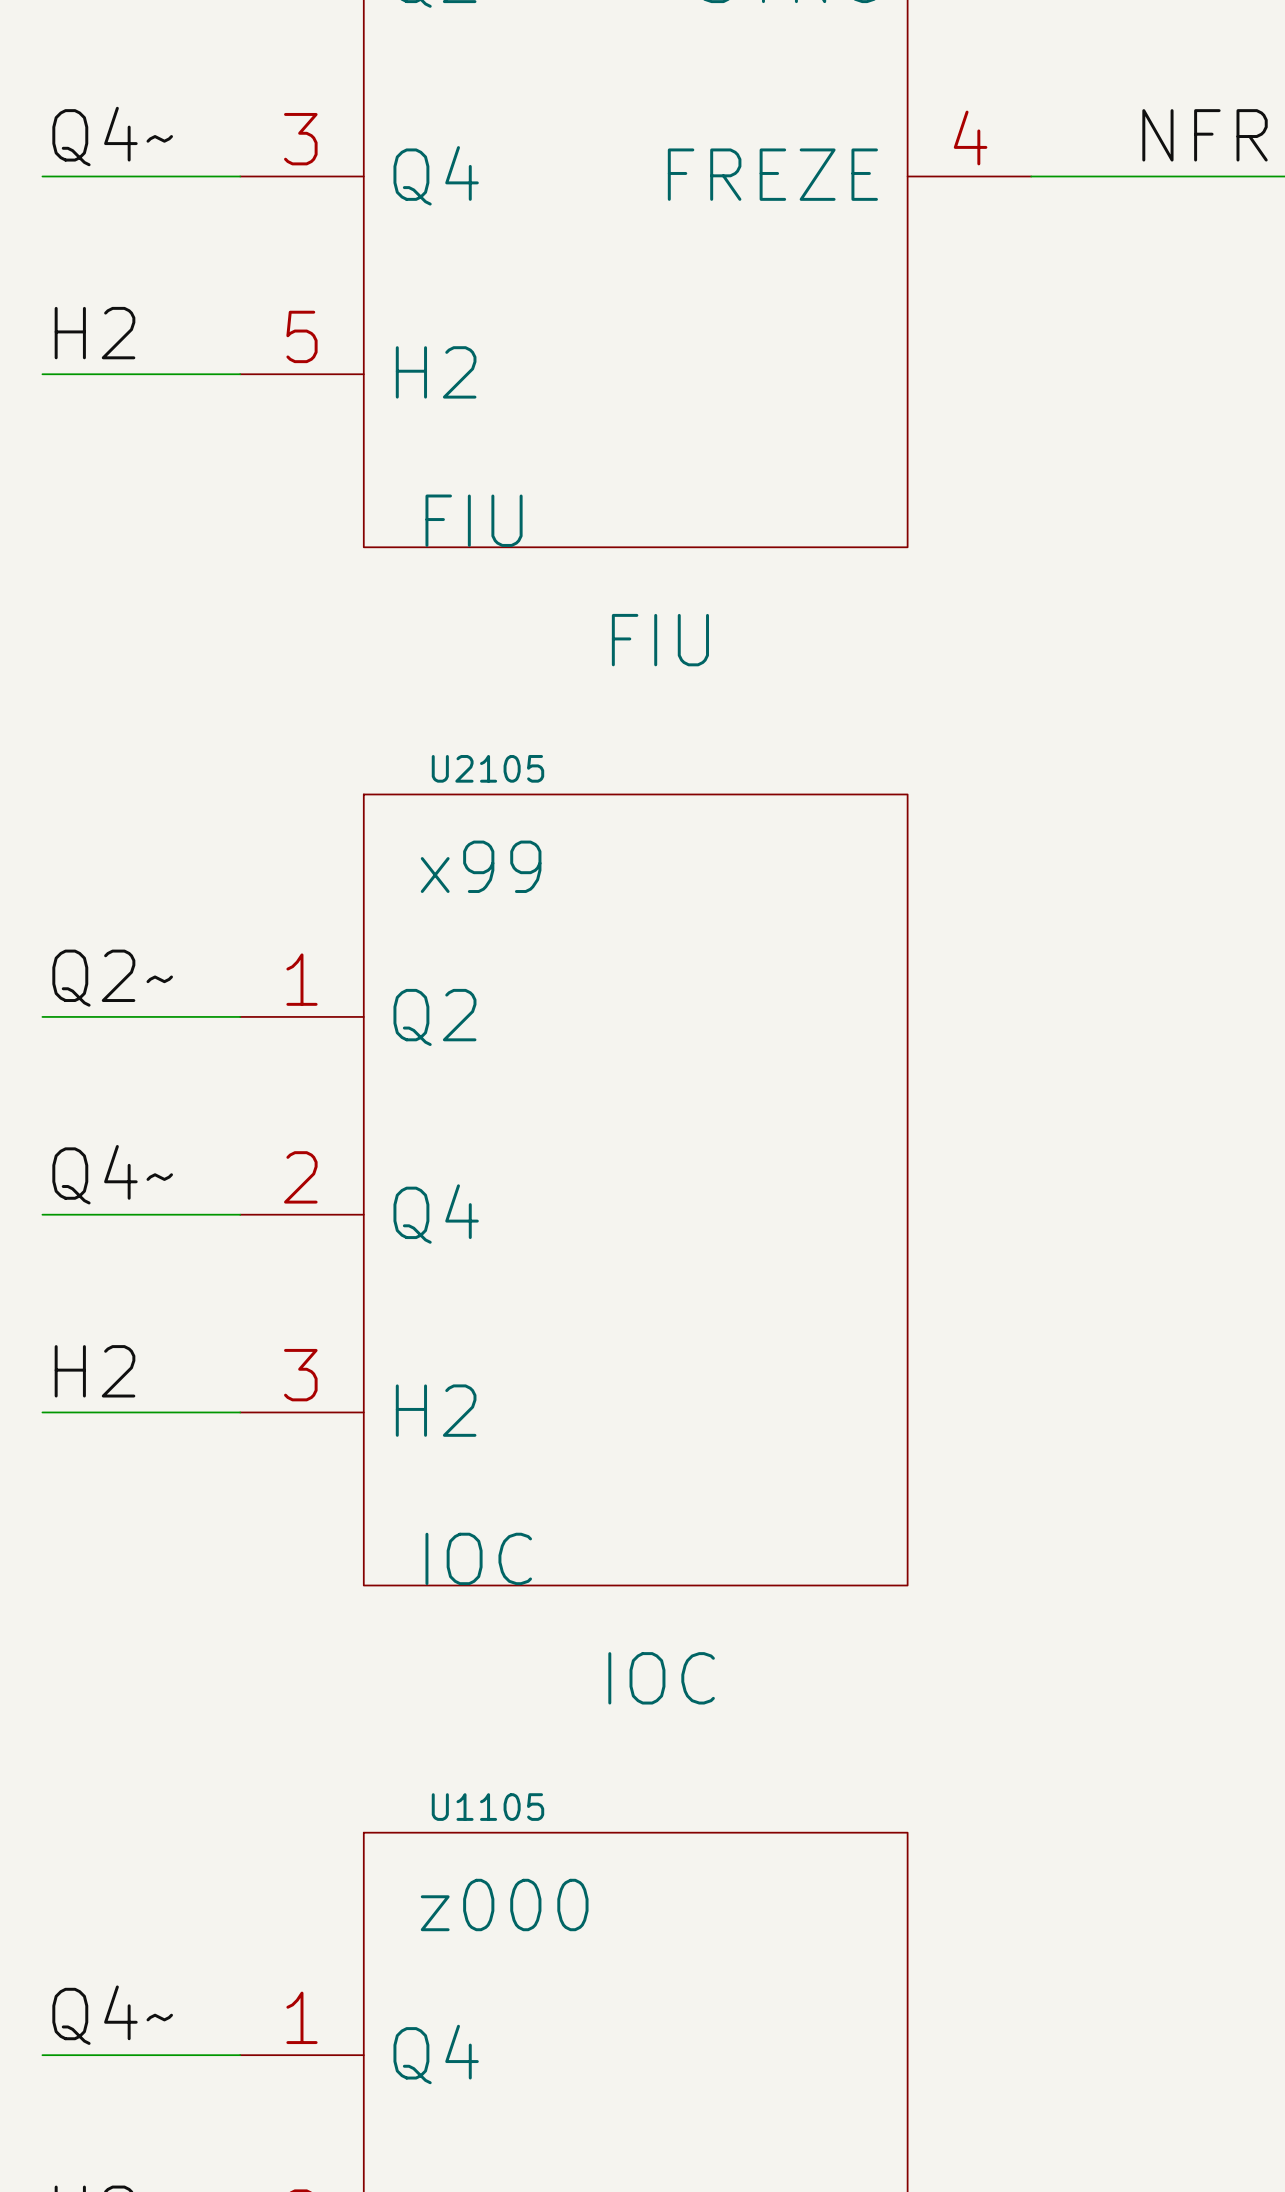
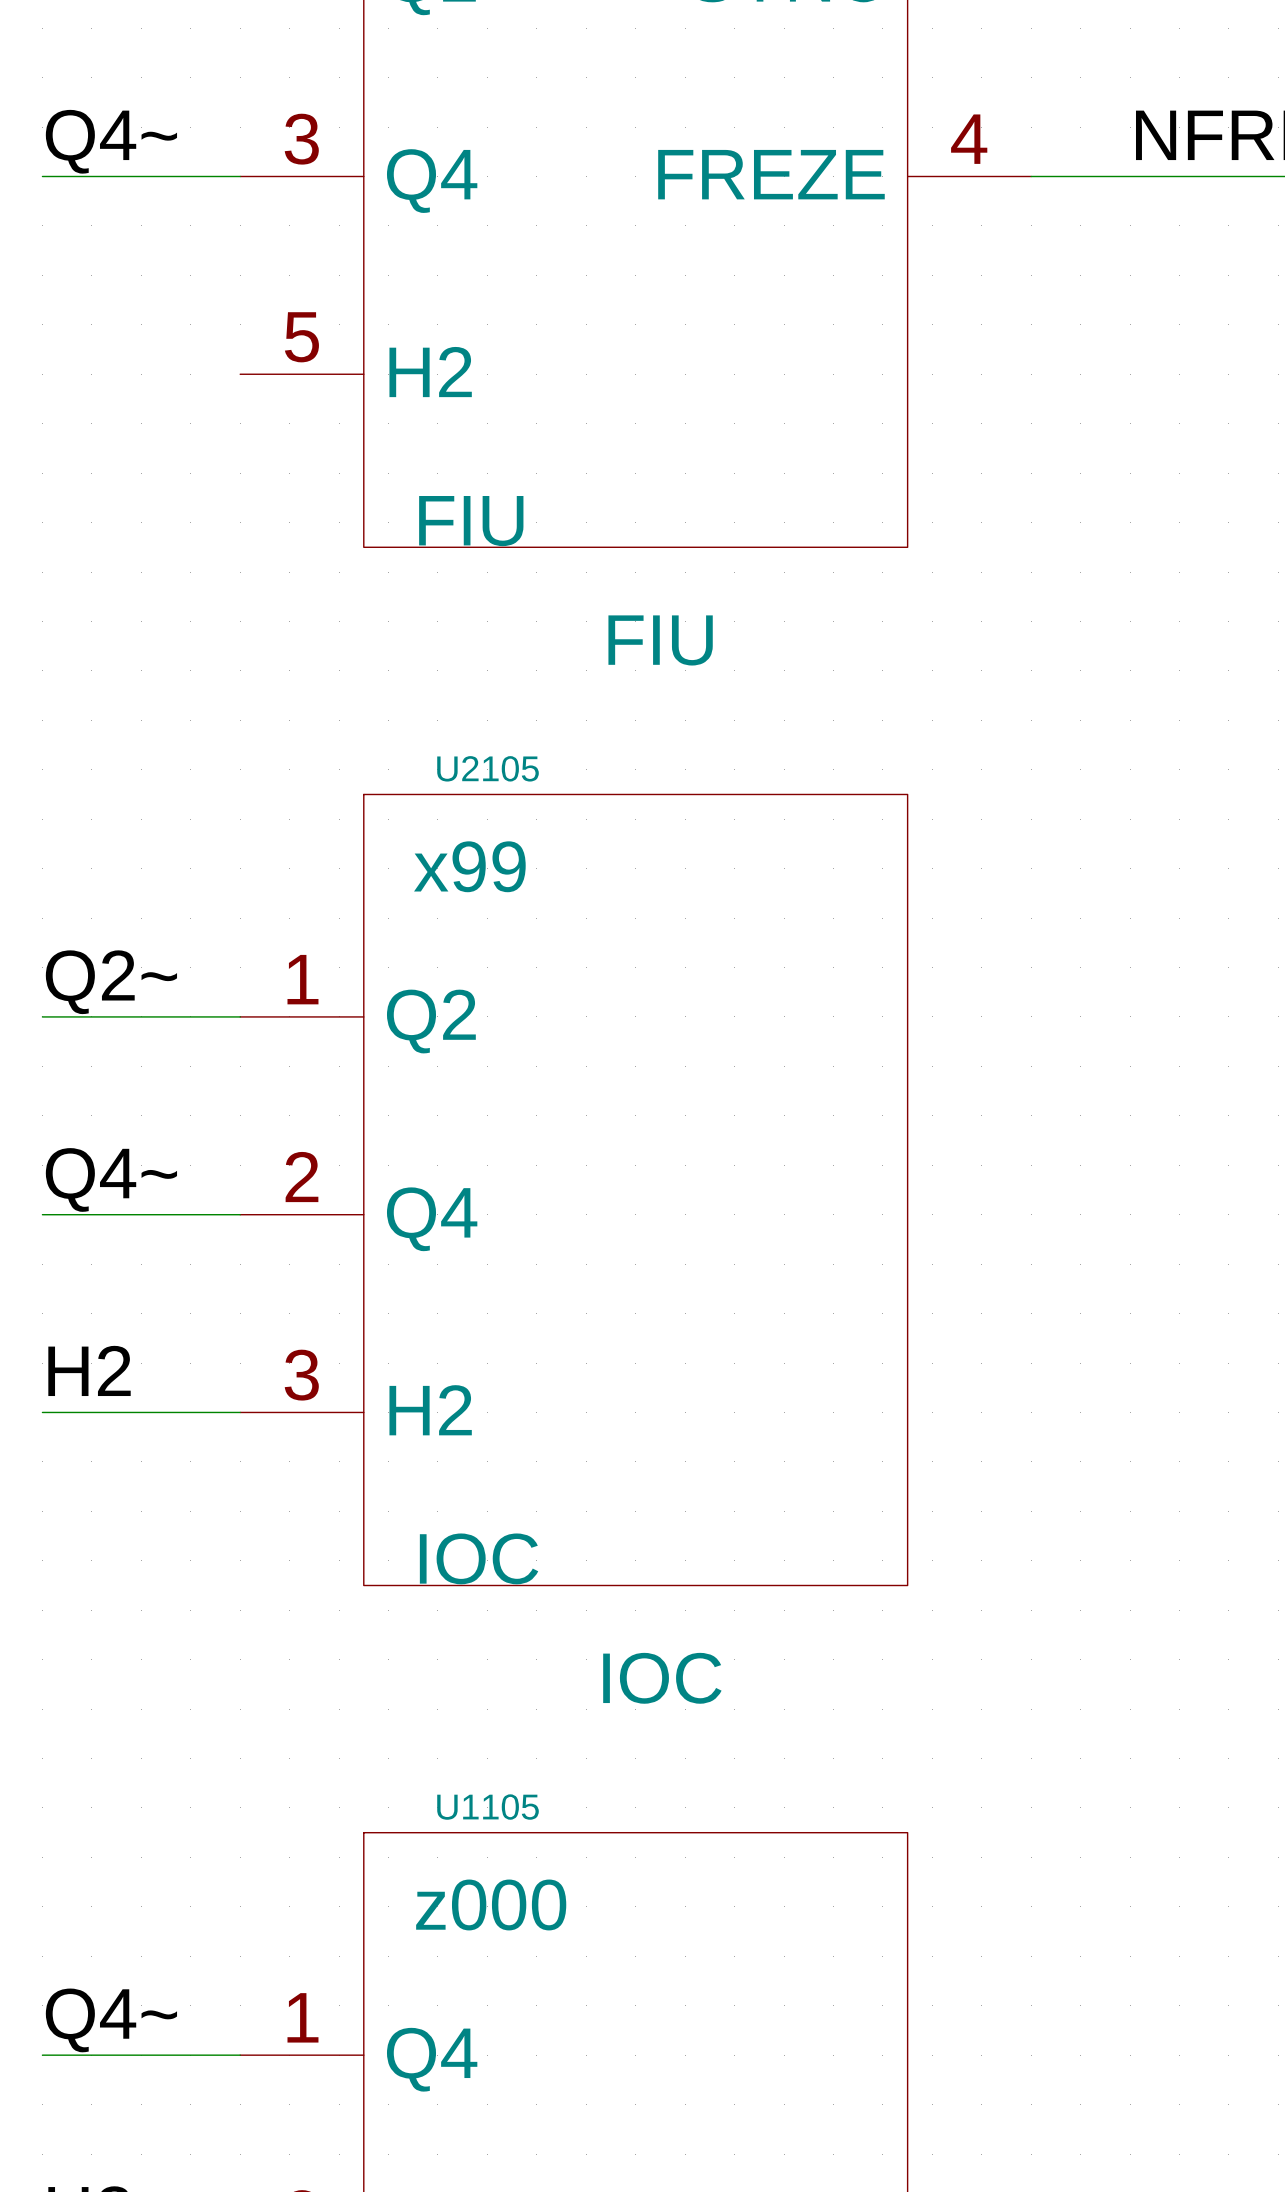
label: H2 (95, 333) -> none
wire: (42, 374) (240, 374) -> none

